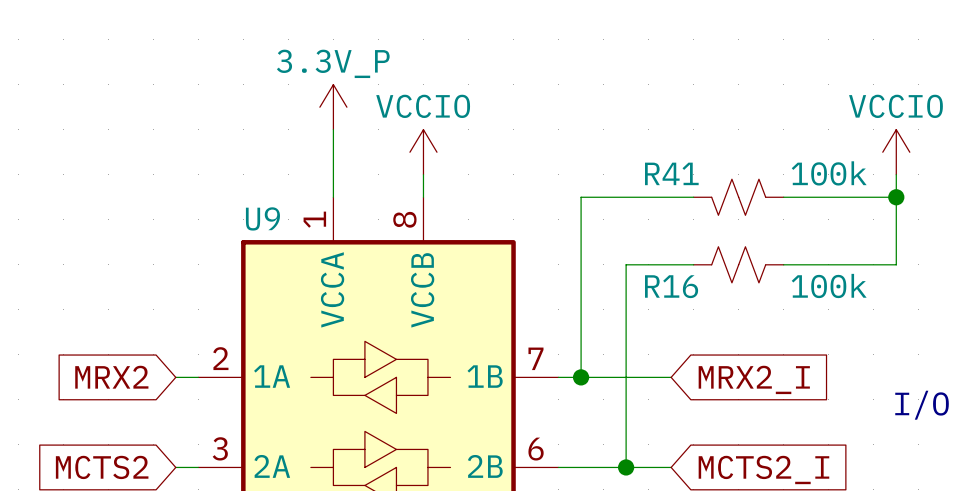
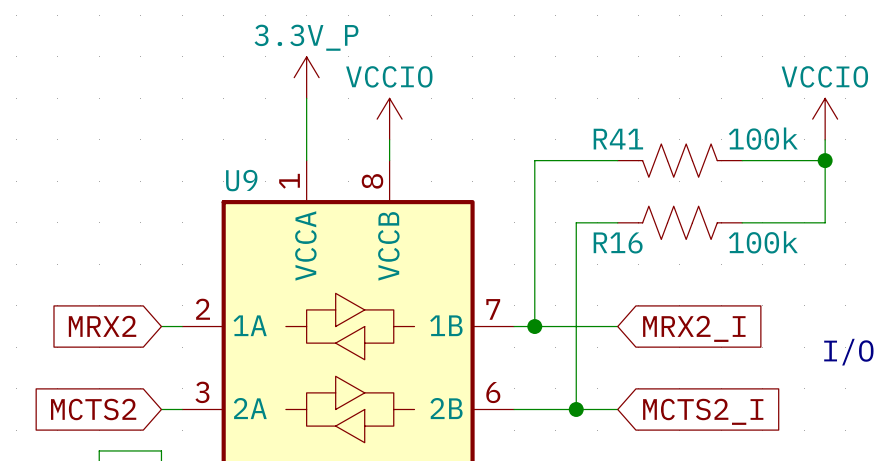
R41 symbol: [693, 179, 784, 216] -> [617, 144, 743, 178]
R16 symbol: [693, 246, 784, 283] -> [617, 206, 743, 240]

